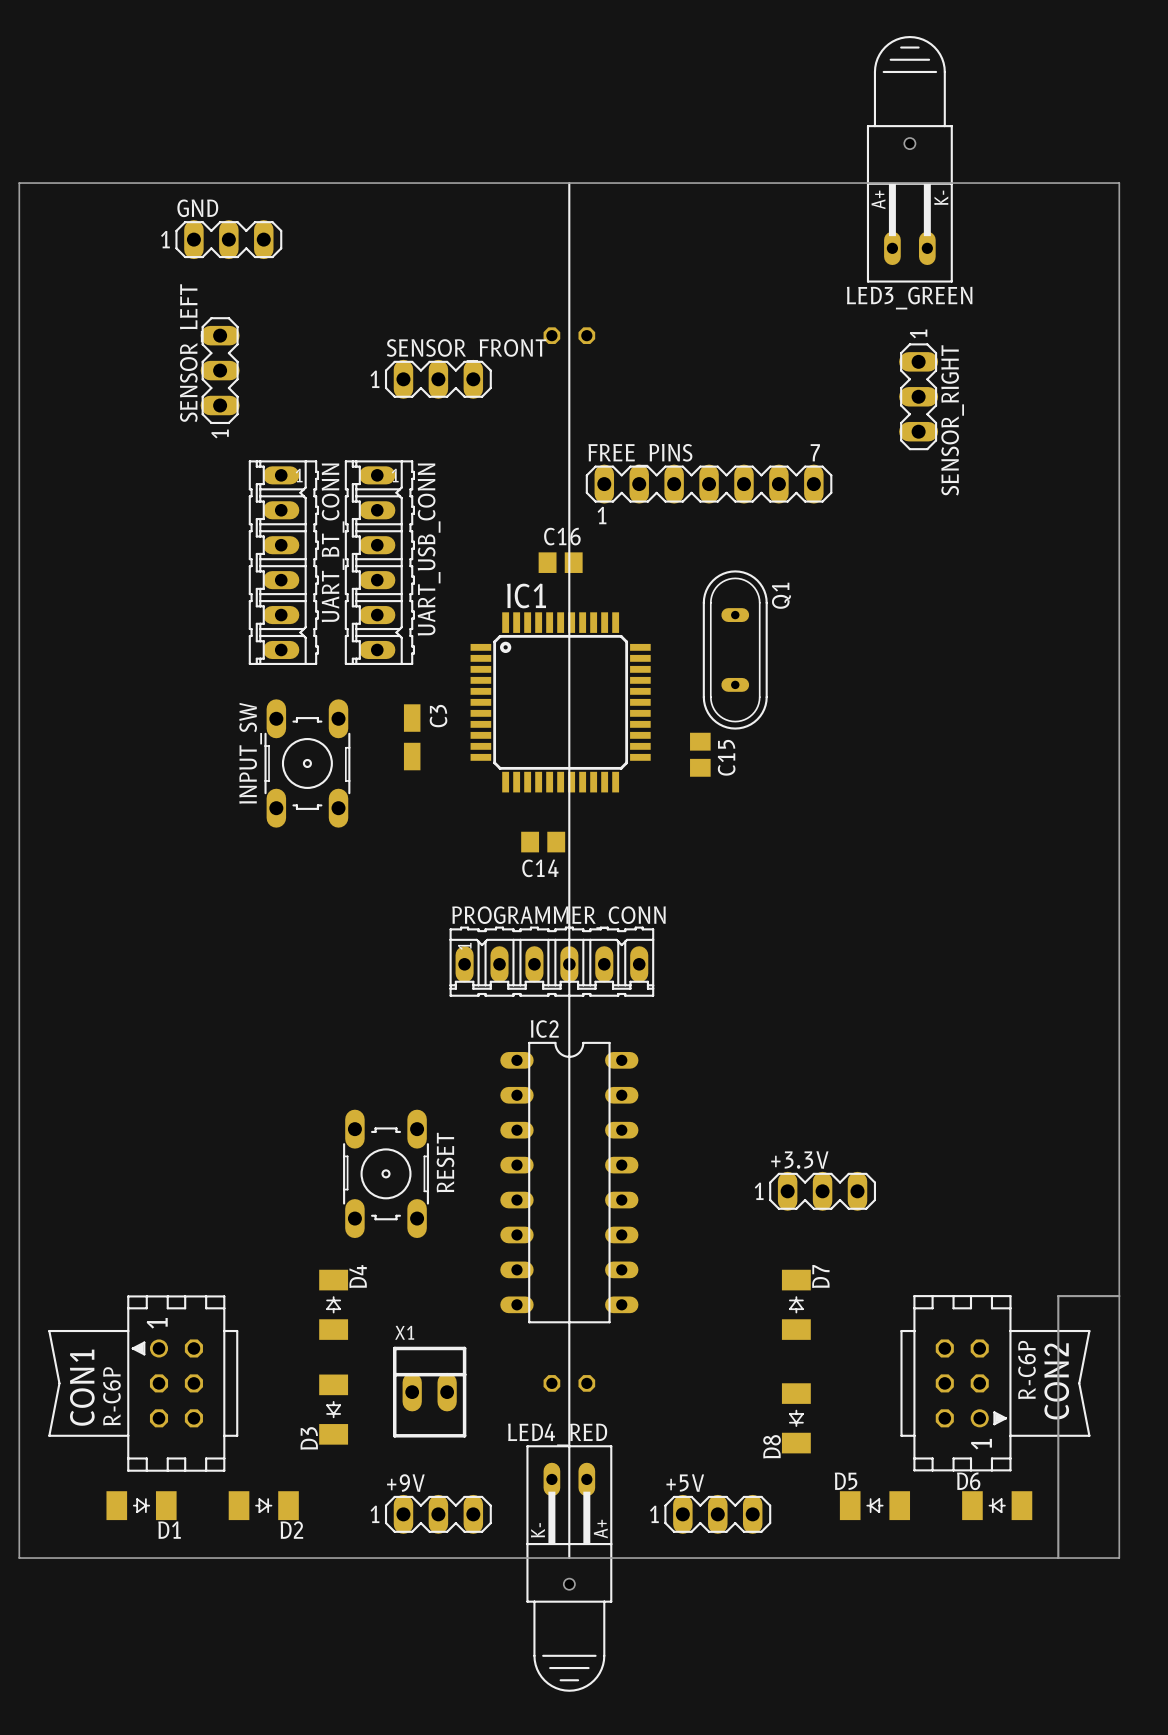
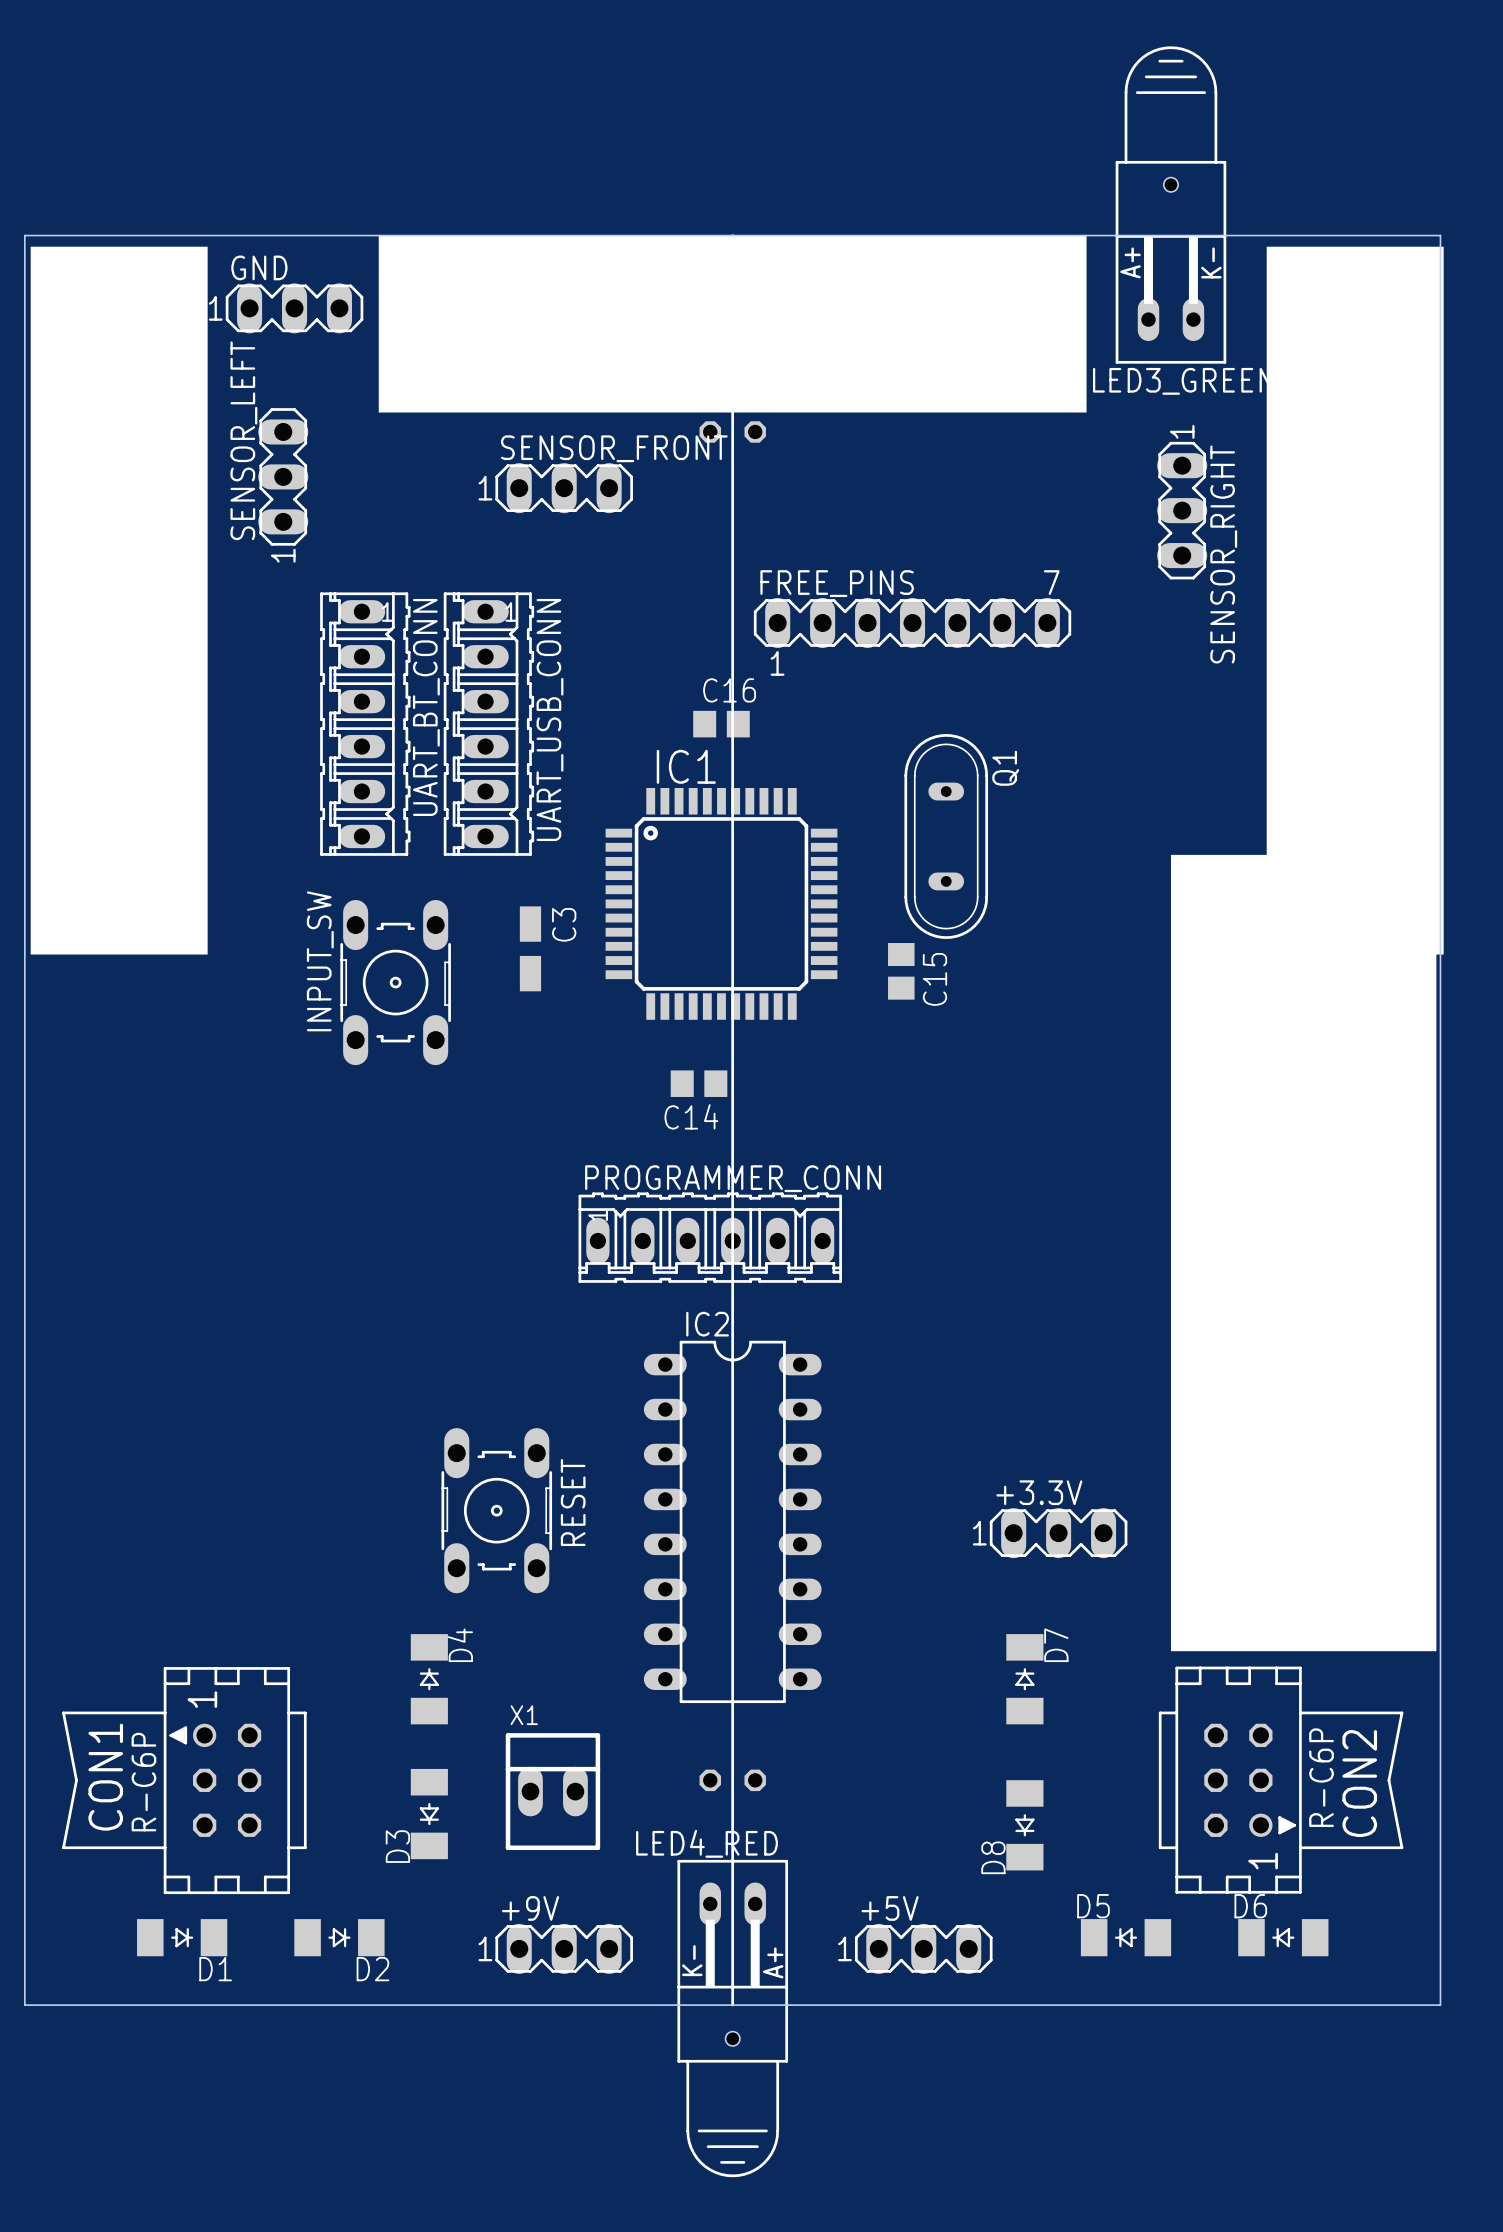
drawing: none -> [378, 235, 1087, 413]
drawing: none -> [30, 246, 208, 955]
drawing: none -> [1170, 246, 1444, 1652]
board edge: (1119, 1296) (1058, 1296) (1058, 1558) -> none

